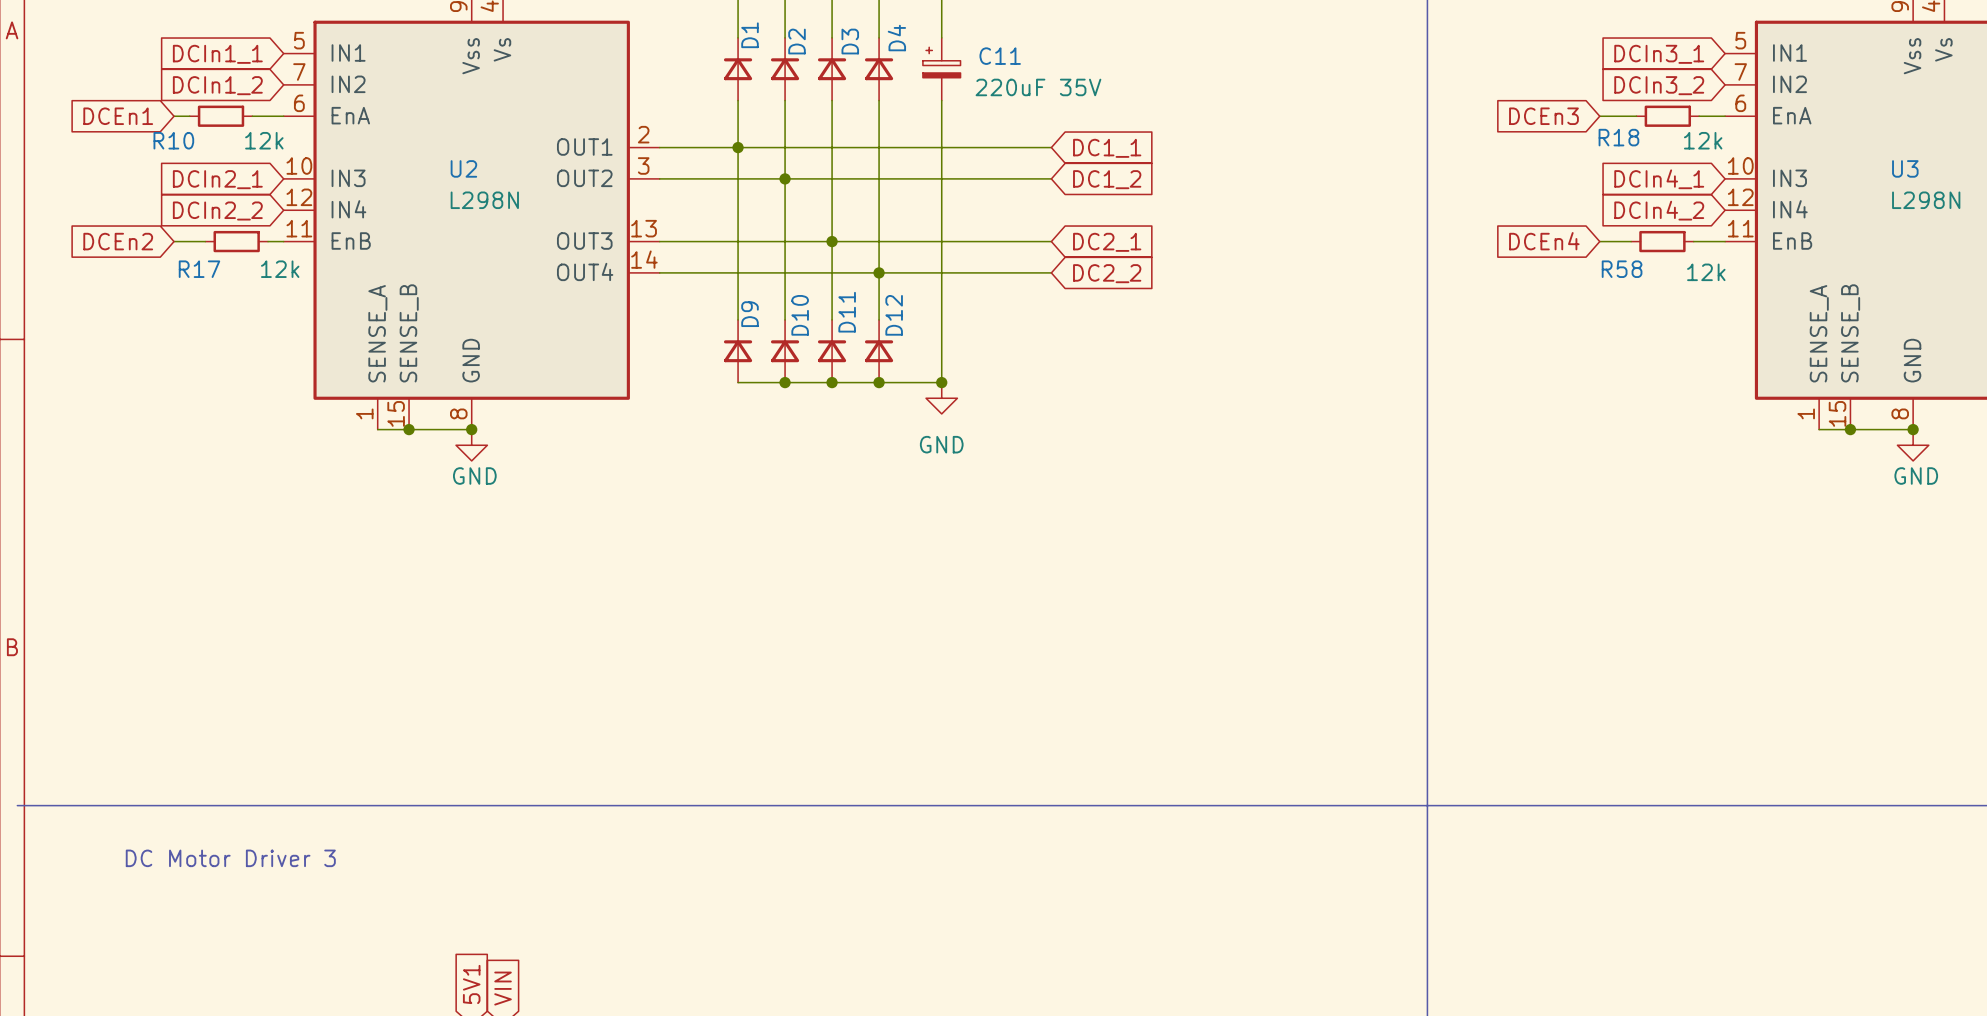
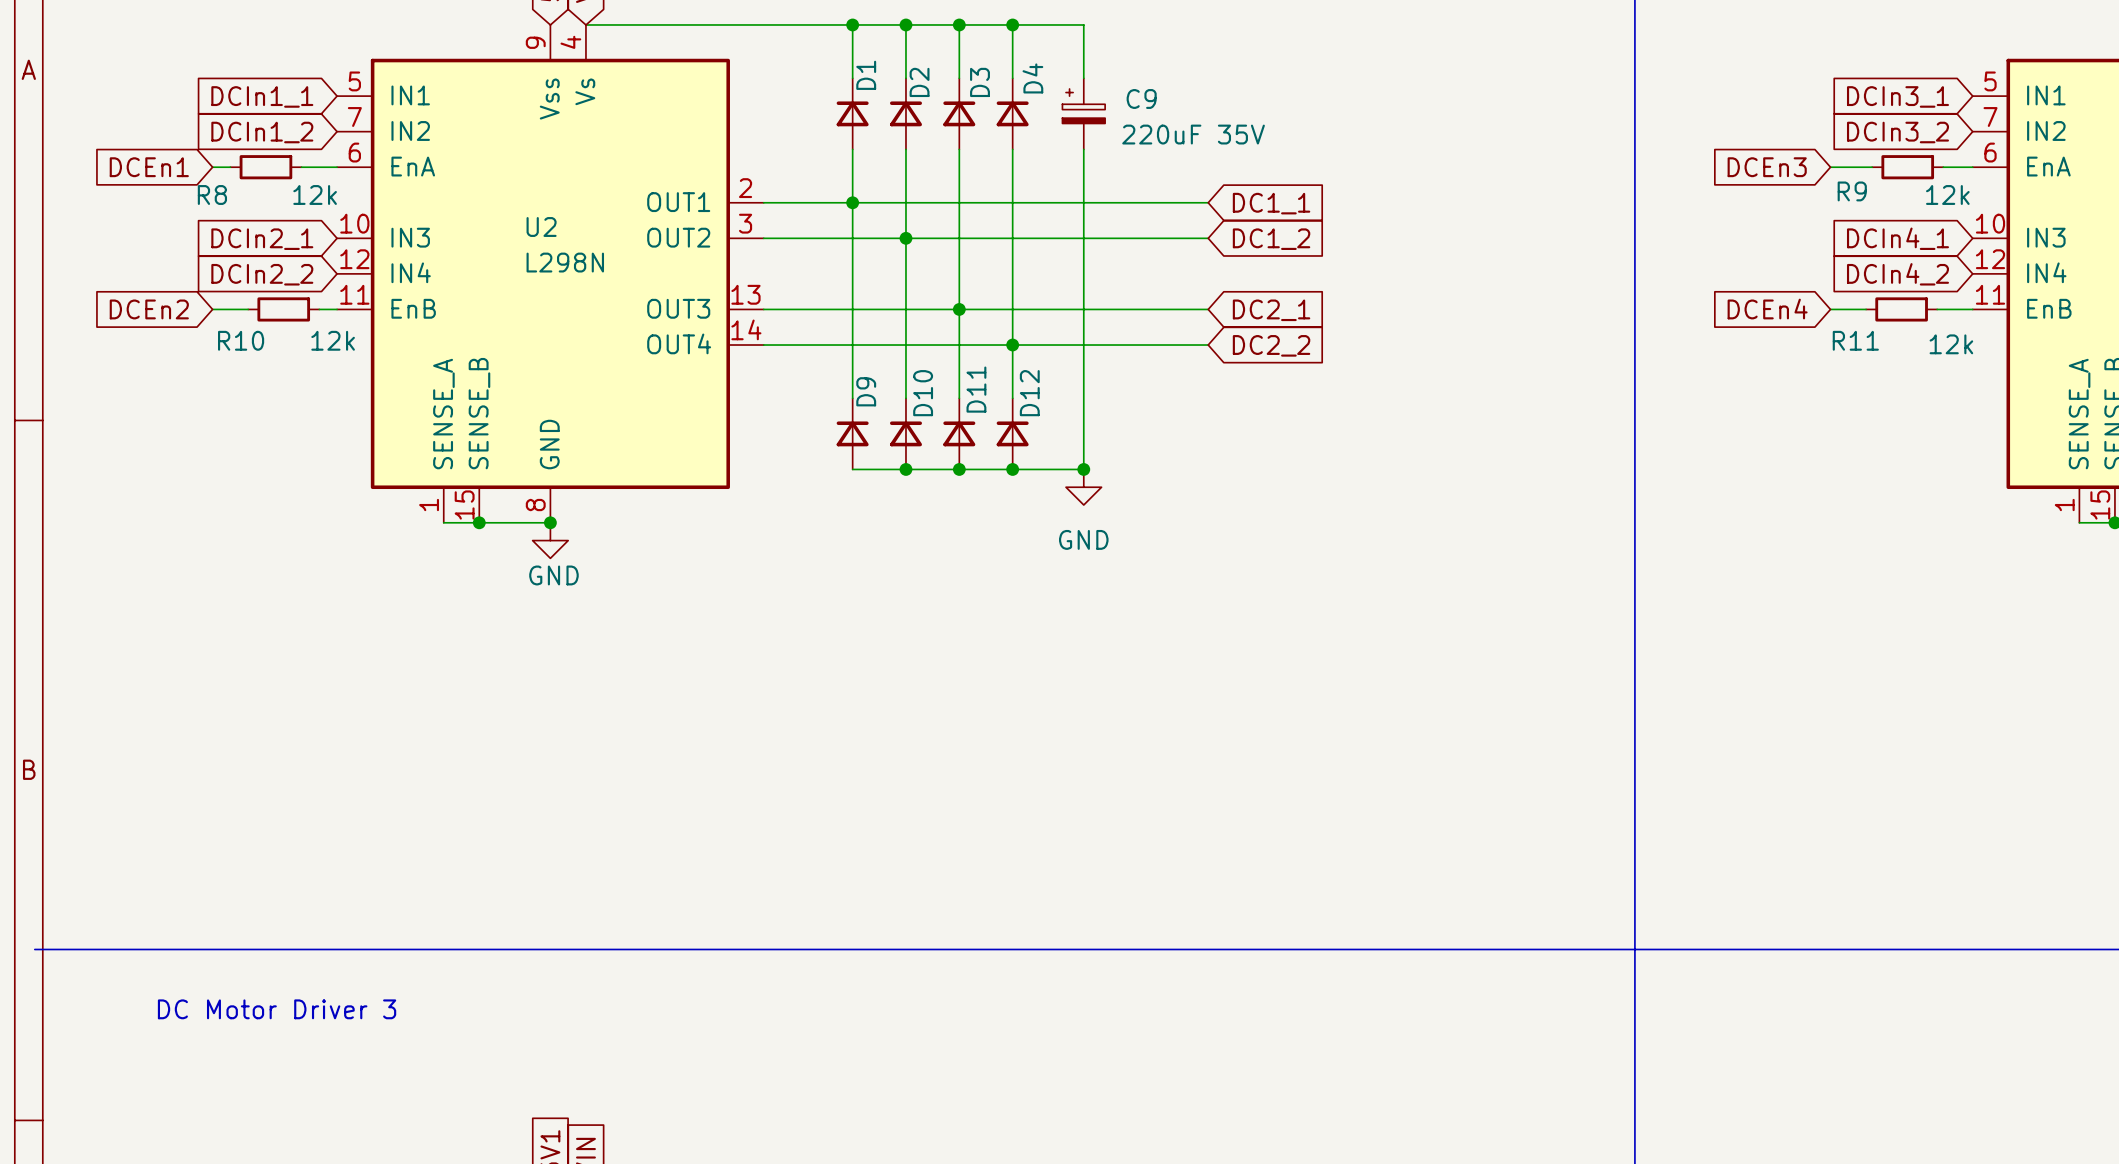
C11 name: C11 (1000, 56) -> C9 (1141, 98)
R18 name: R18 (1618, 137) -> R9 (1852, 191)
R10 name: R10 (173, 140) -> R8 (212, 195)
R17 name: R17 (199, 269) -> R10 (241, 340)
R58 name: R58 (1622, 269) -> R11 (1855, 340)

